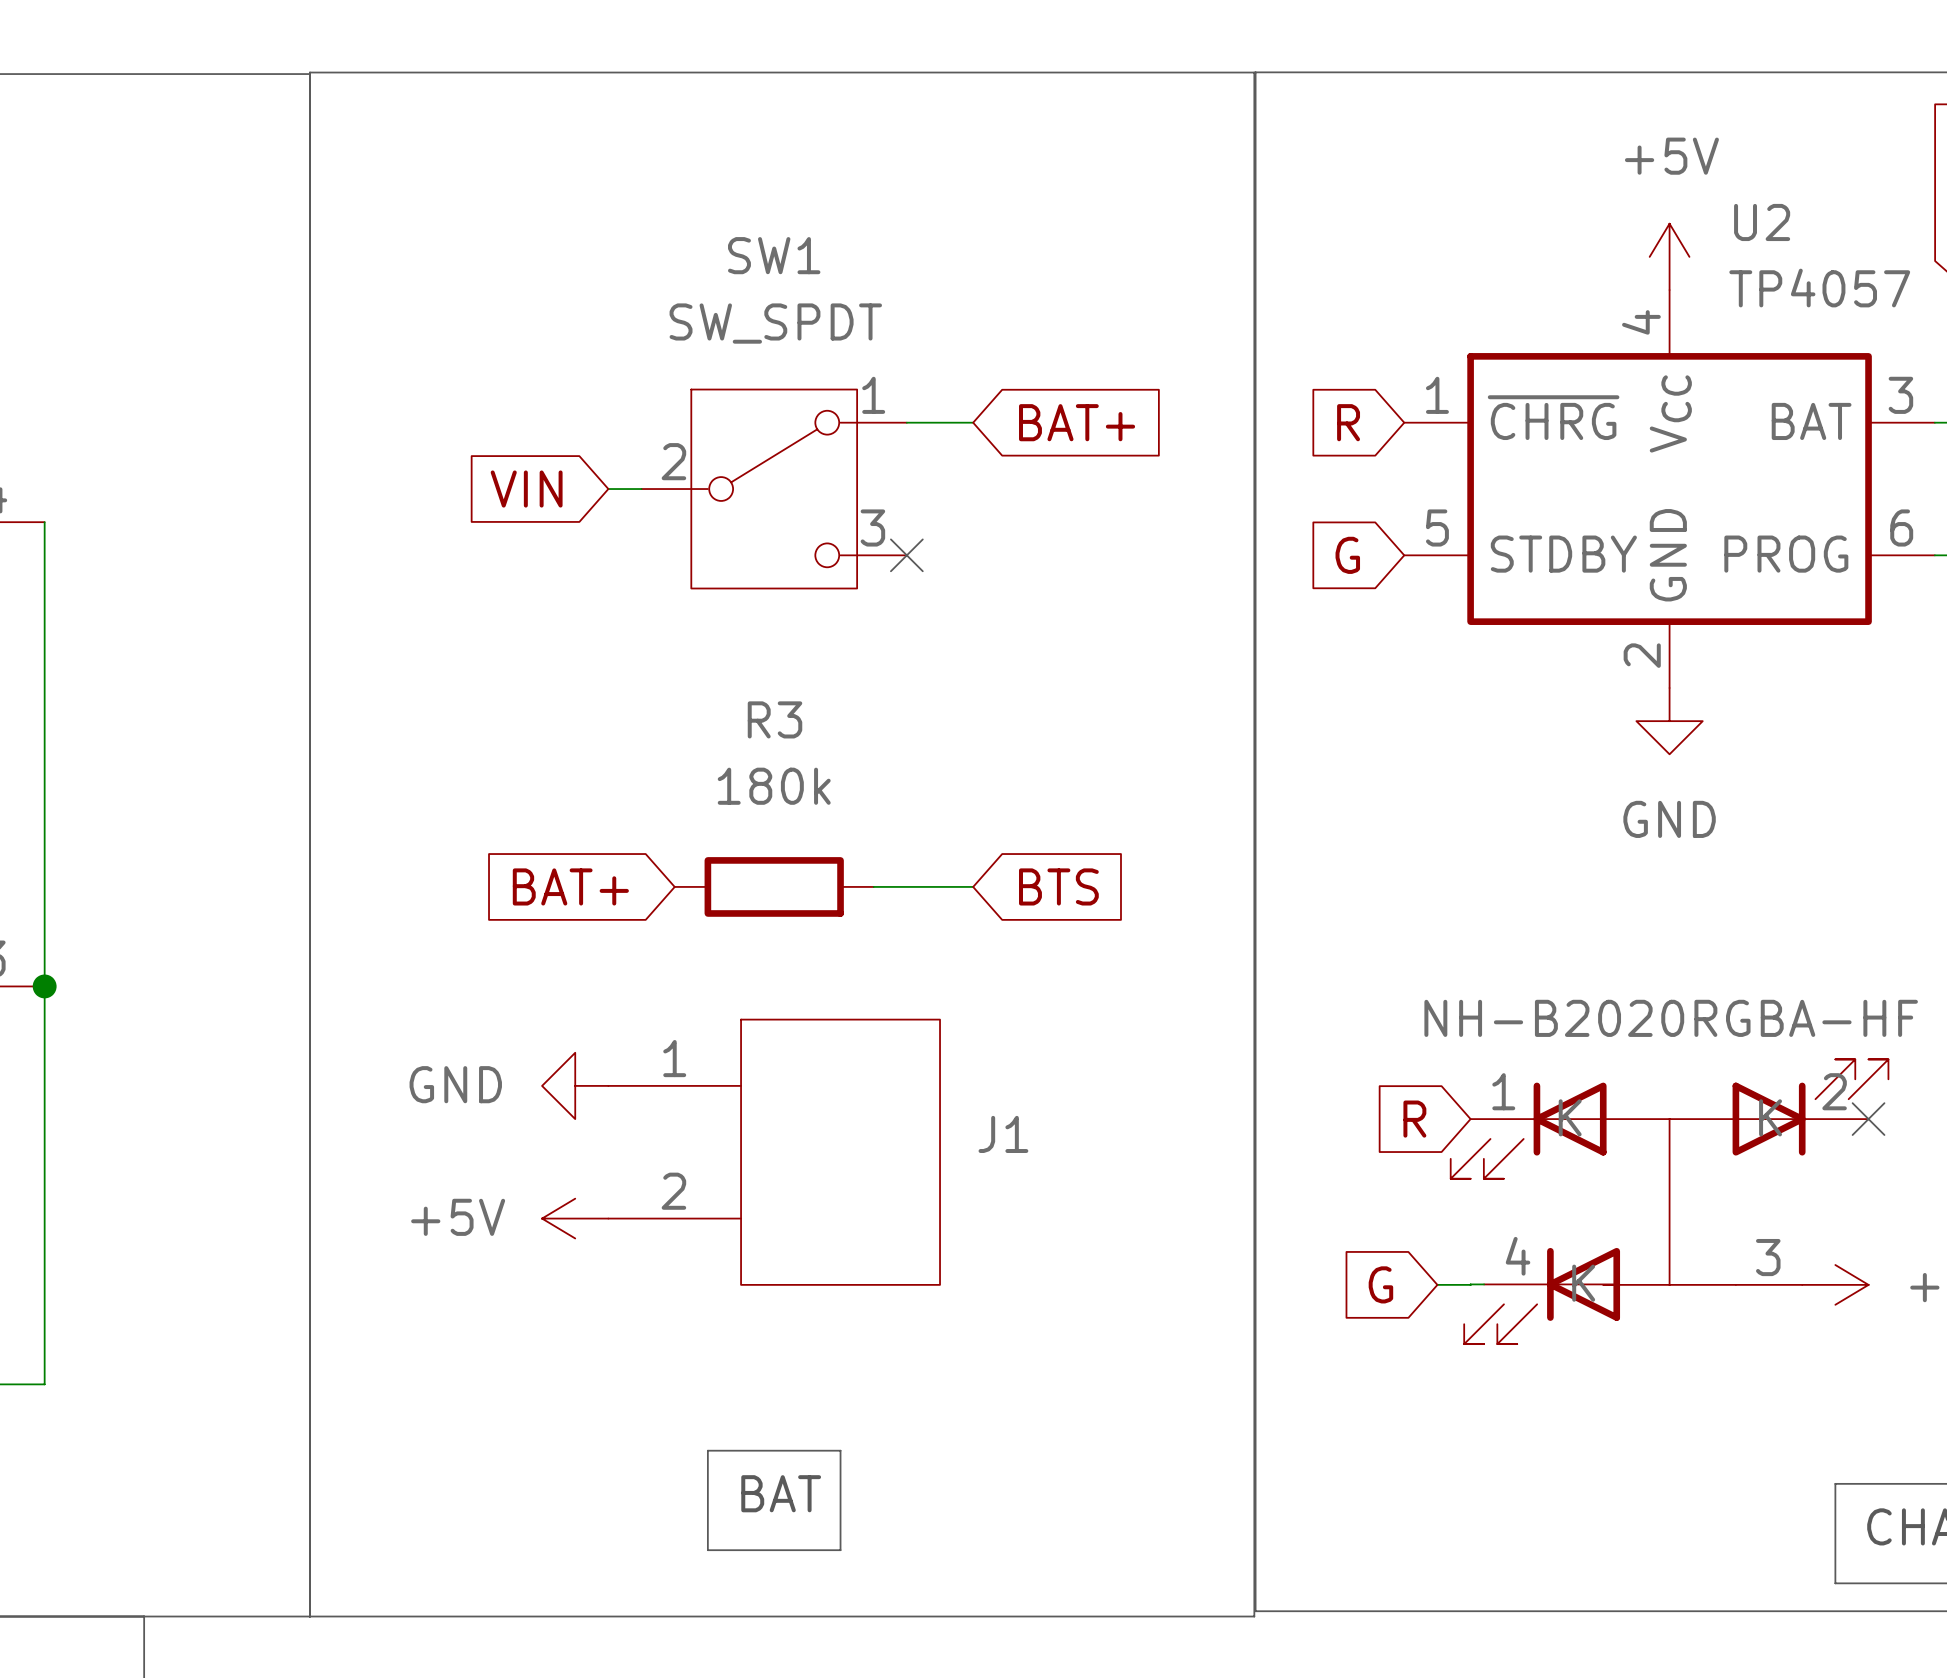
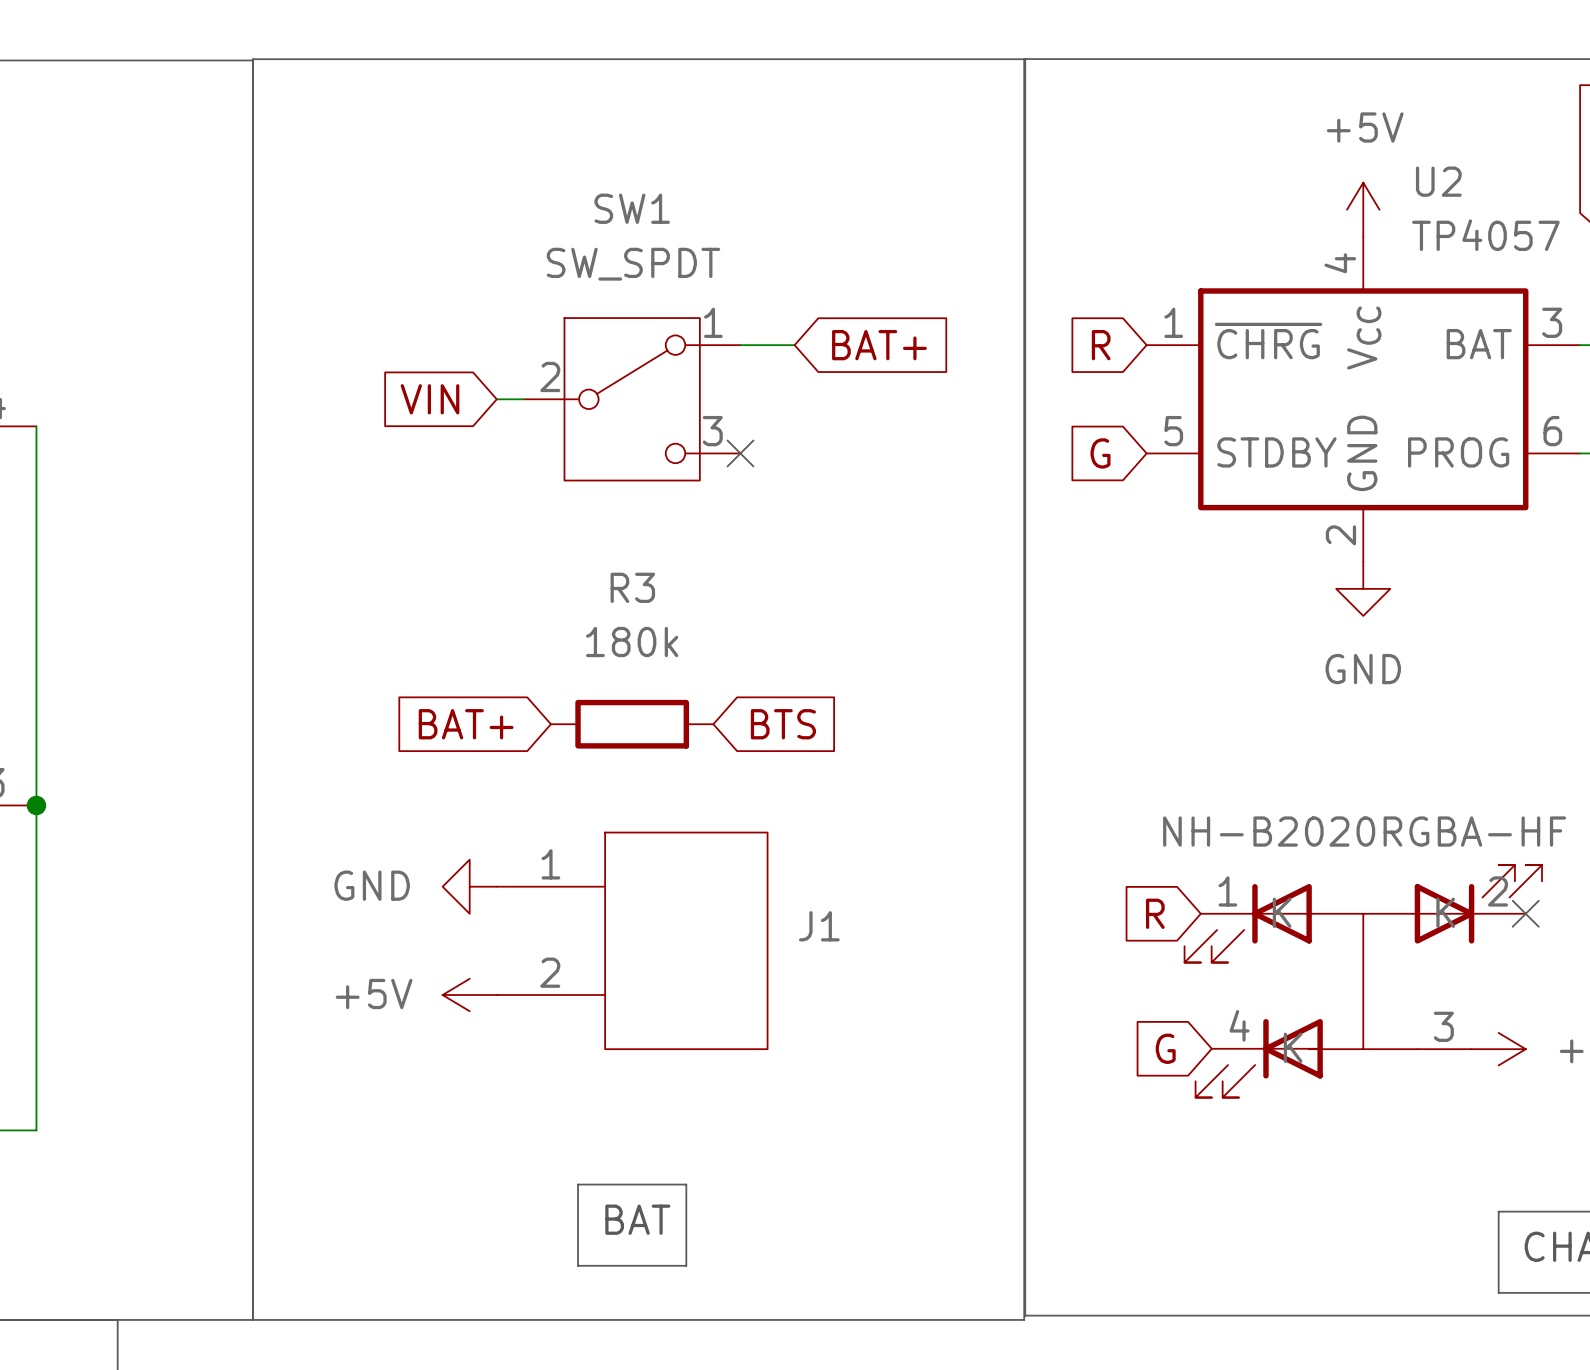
wire: (873, 886) (973, 886) -> none
global label position: BTS (1058, 886) -> BTS (783, 724)
global label position: G (1380, 1284) -> G (1165, 1048)
wire: (1437, 1284) (1470, 1284) -> none
wire: (1470, 1284) (1484, 1284) -> none

